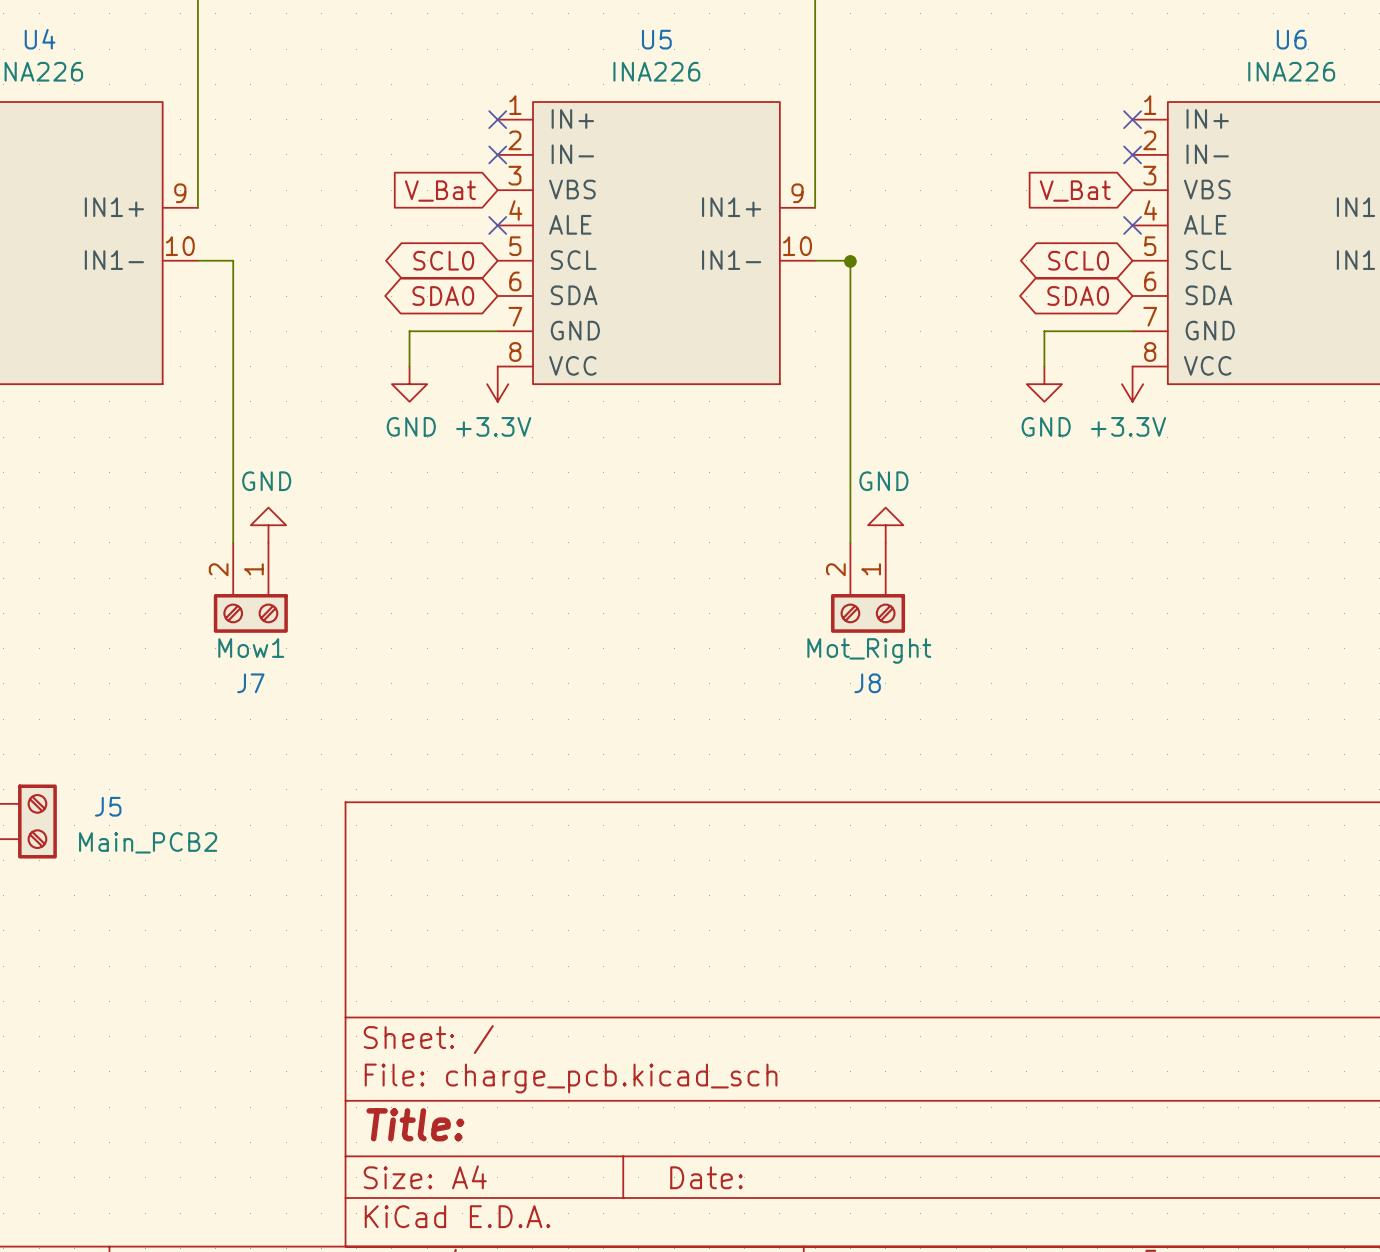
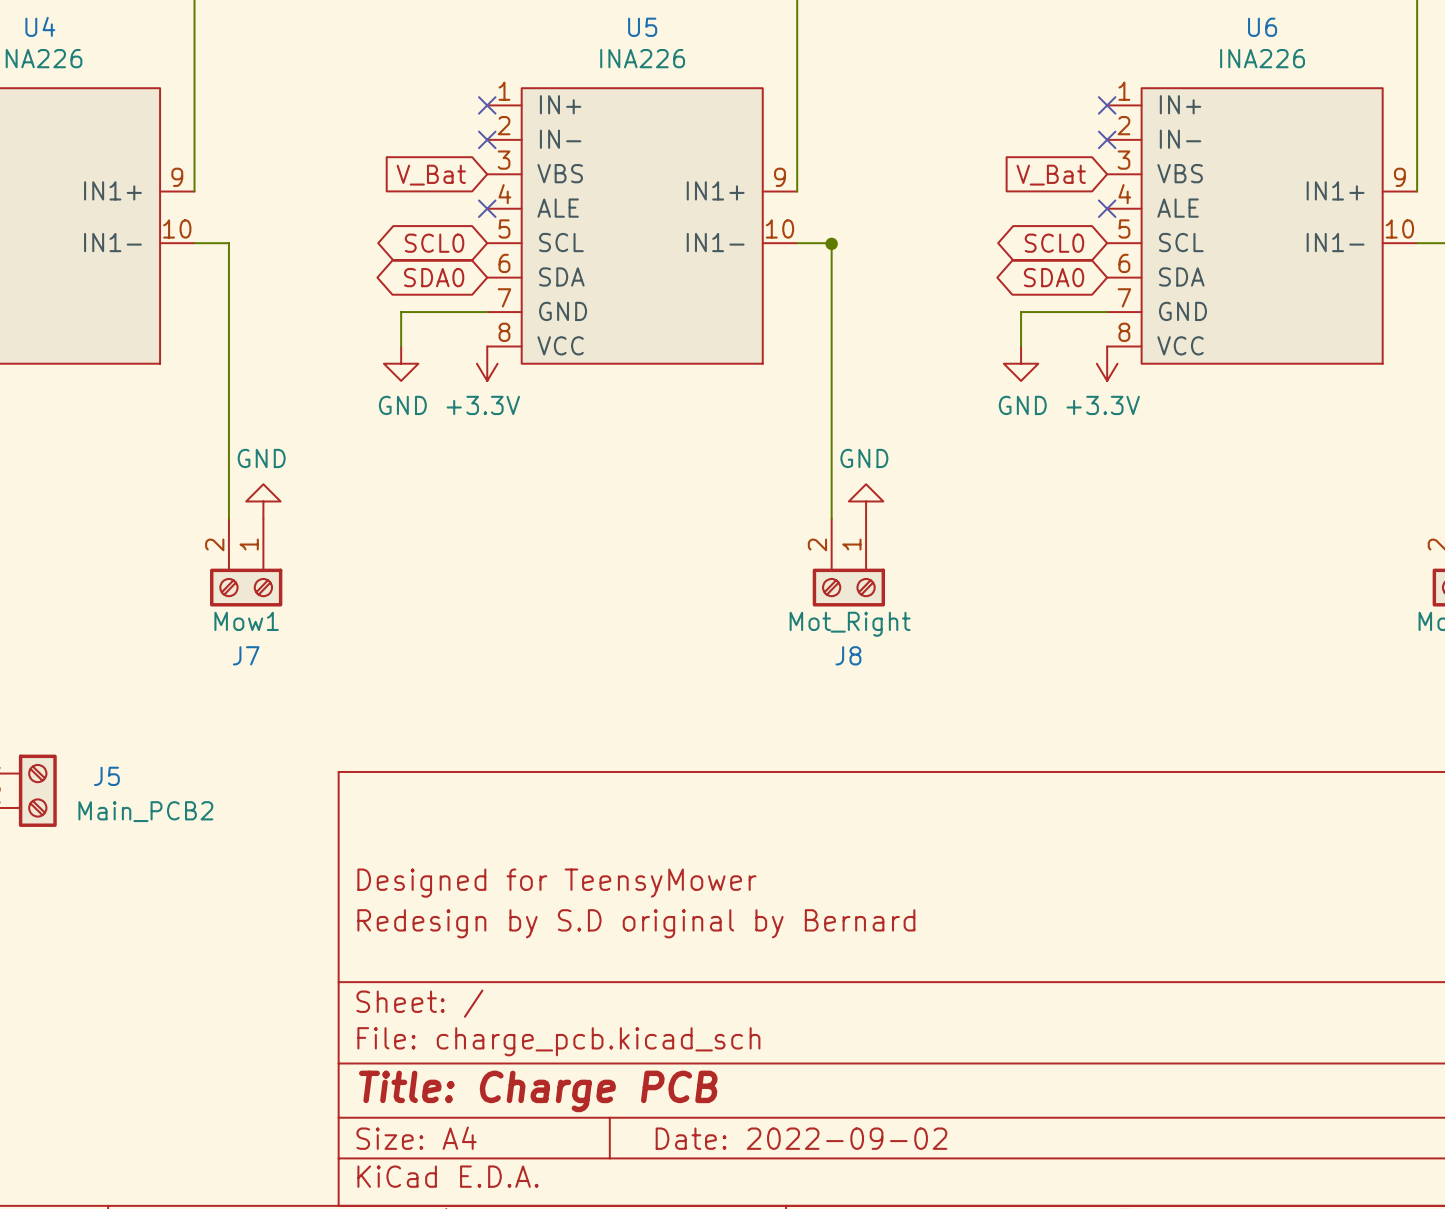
title block: none -> Designed for TeensyMower (556, 883)
title block: none -> Redesign by S.D original by Bernard (636, 923)
title block: Title: (415, 1124) -> Title: Charge PCB (538, 1091)
title block: Date: (706, 1177) -> Date: 2022-09-02 (801, 1138)

